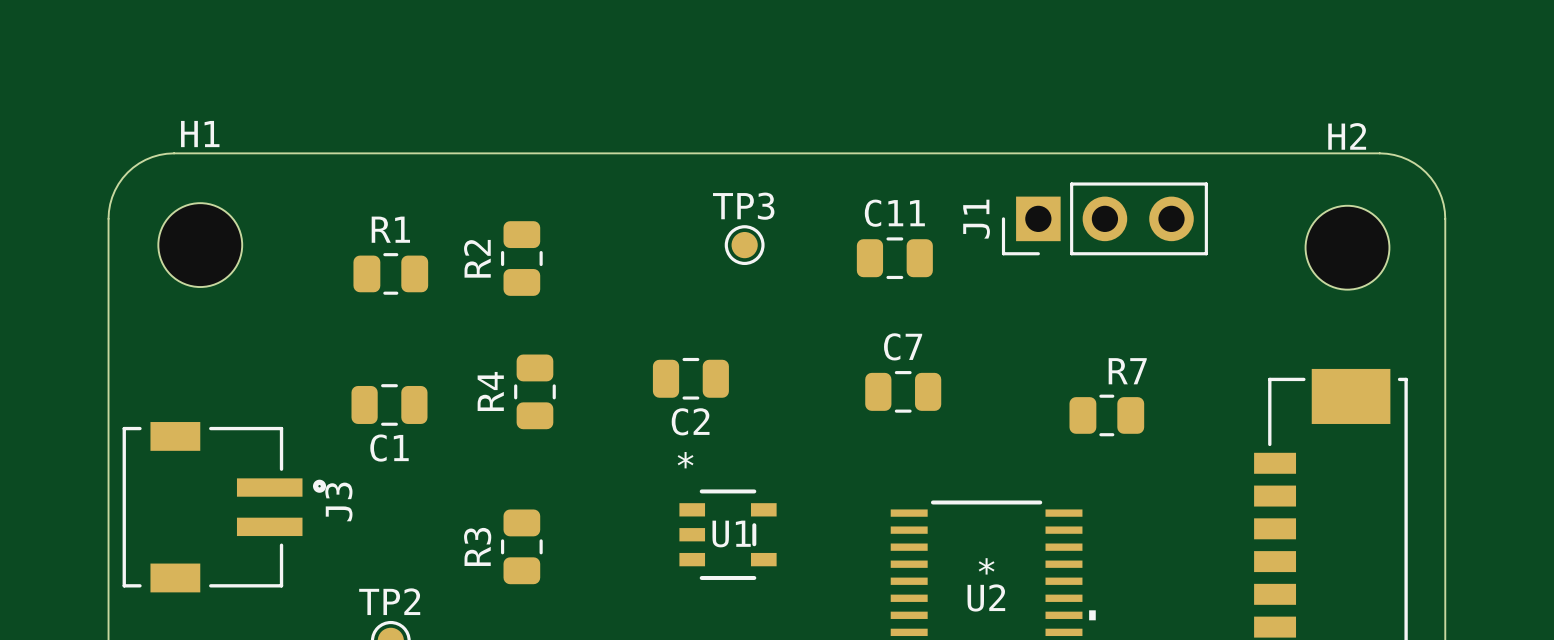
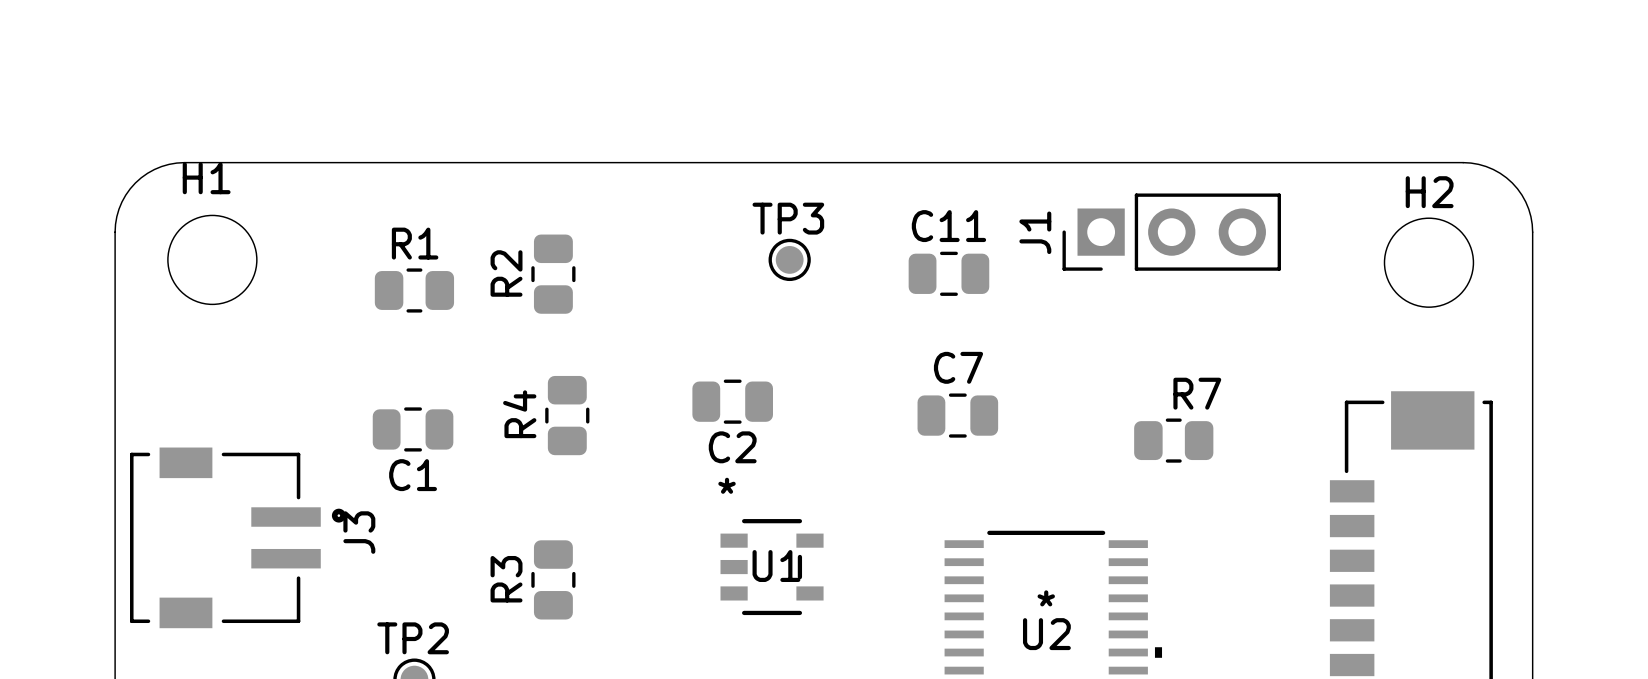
H1 name position: H1 (200, 134) -> H1 (206, 178)
H2 name position: H2 (1347, 136) -> H2 (1429, 192)

